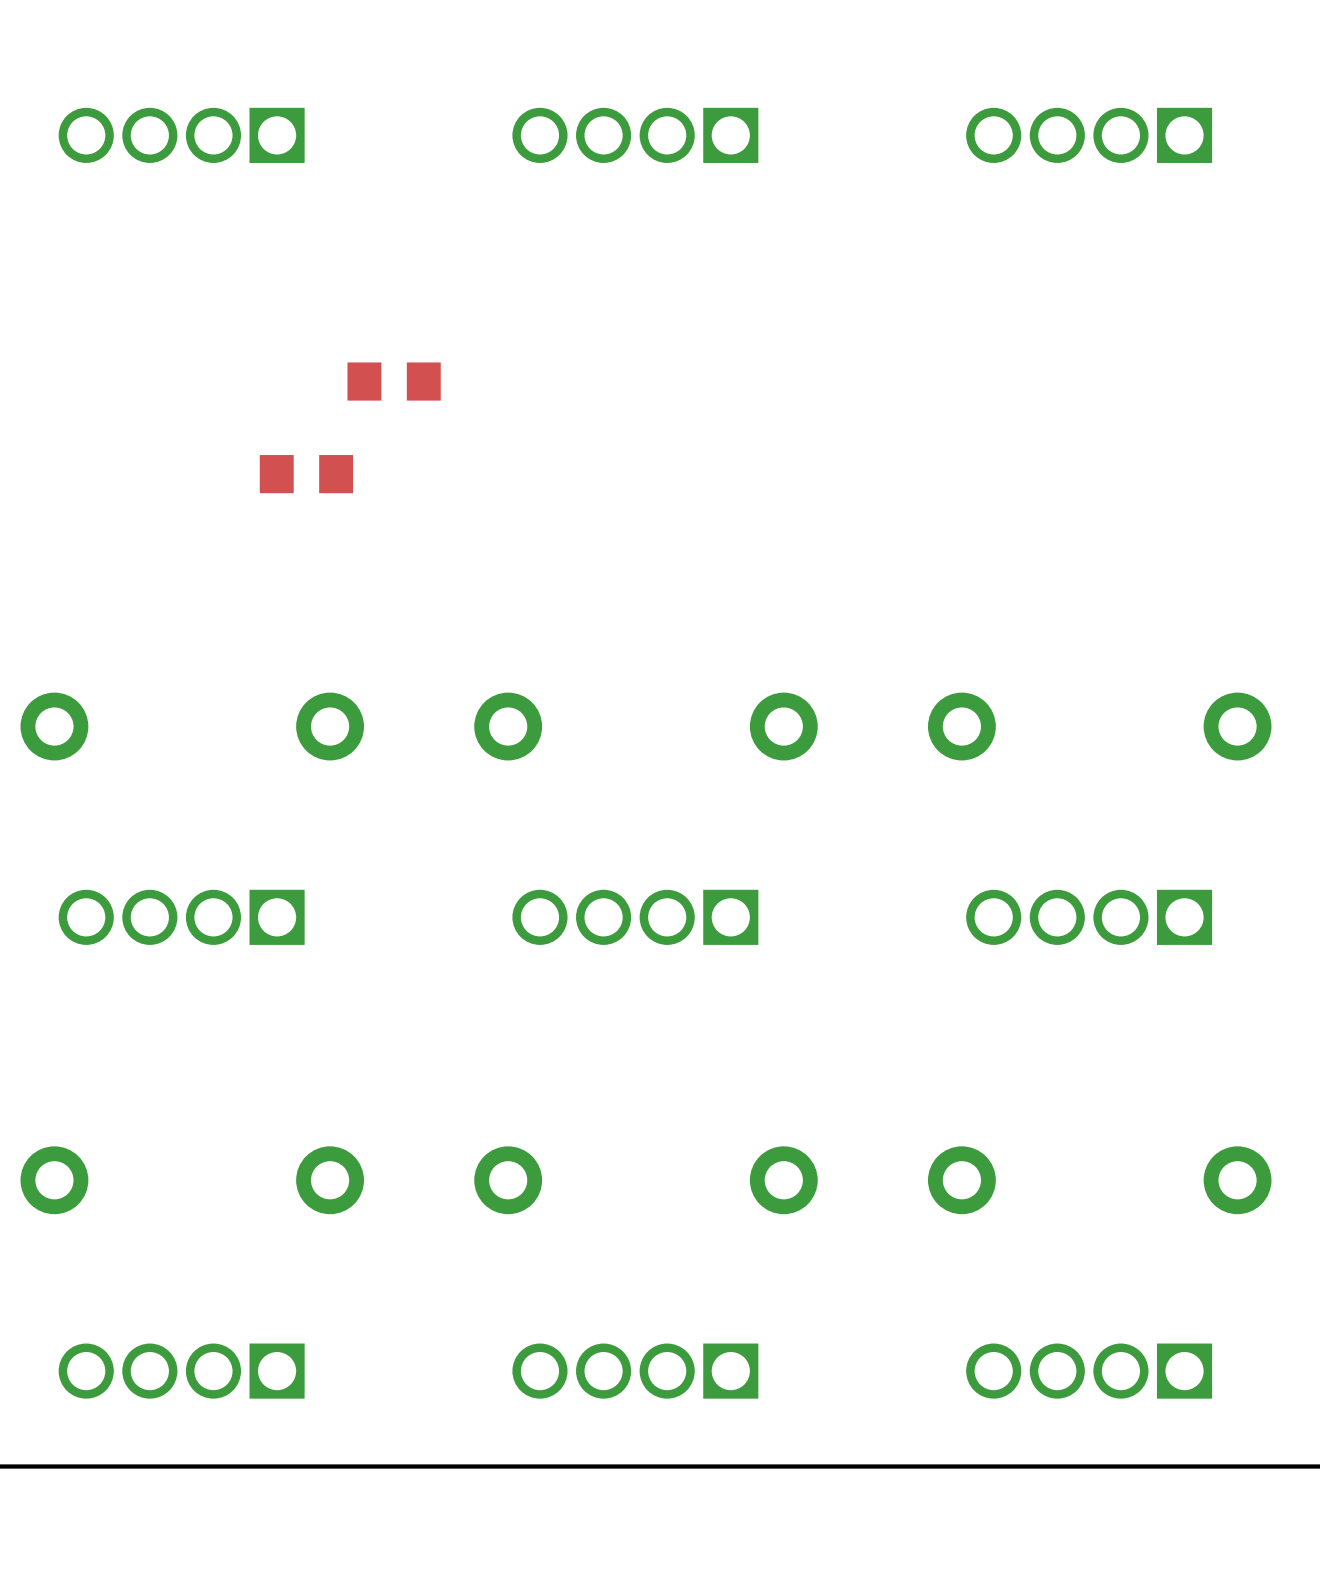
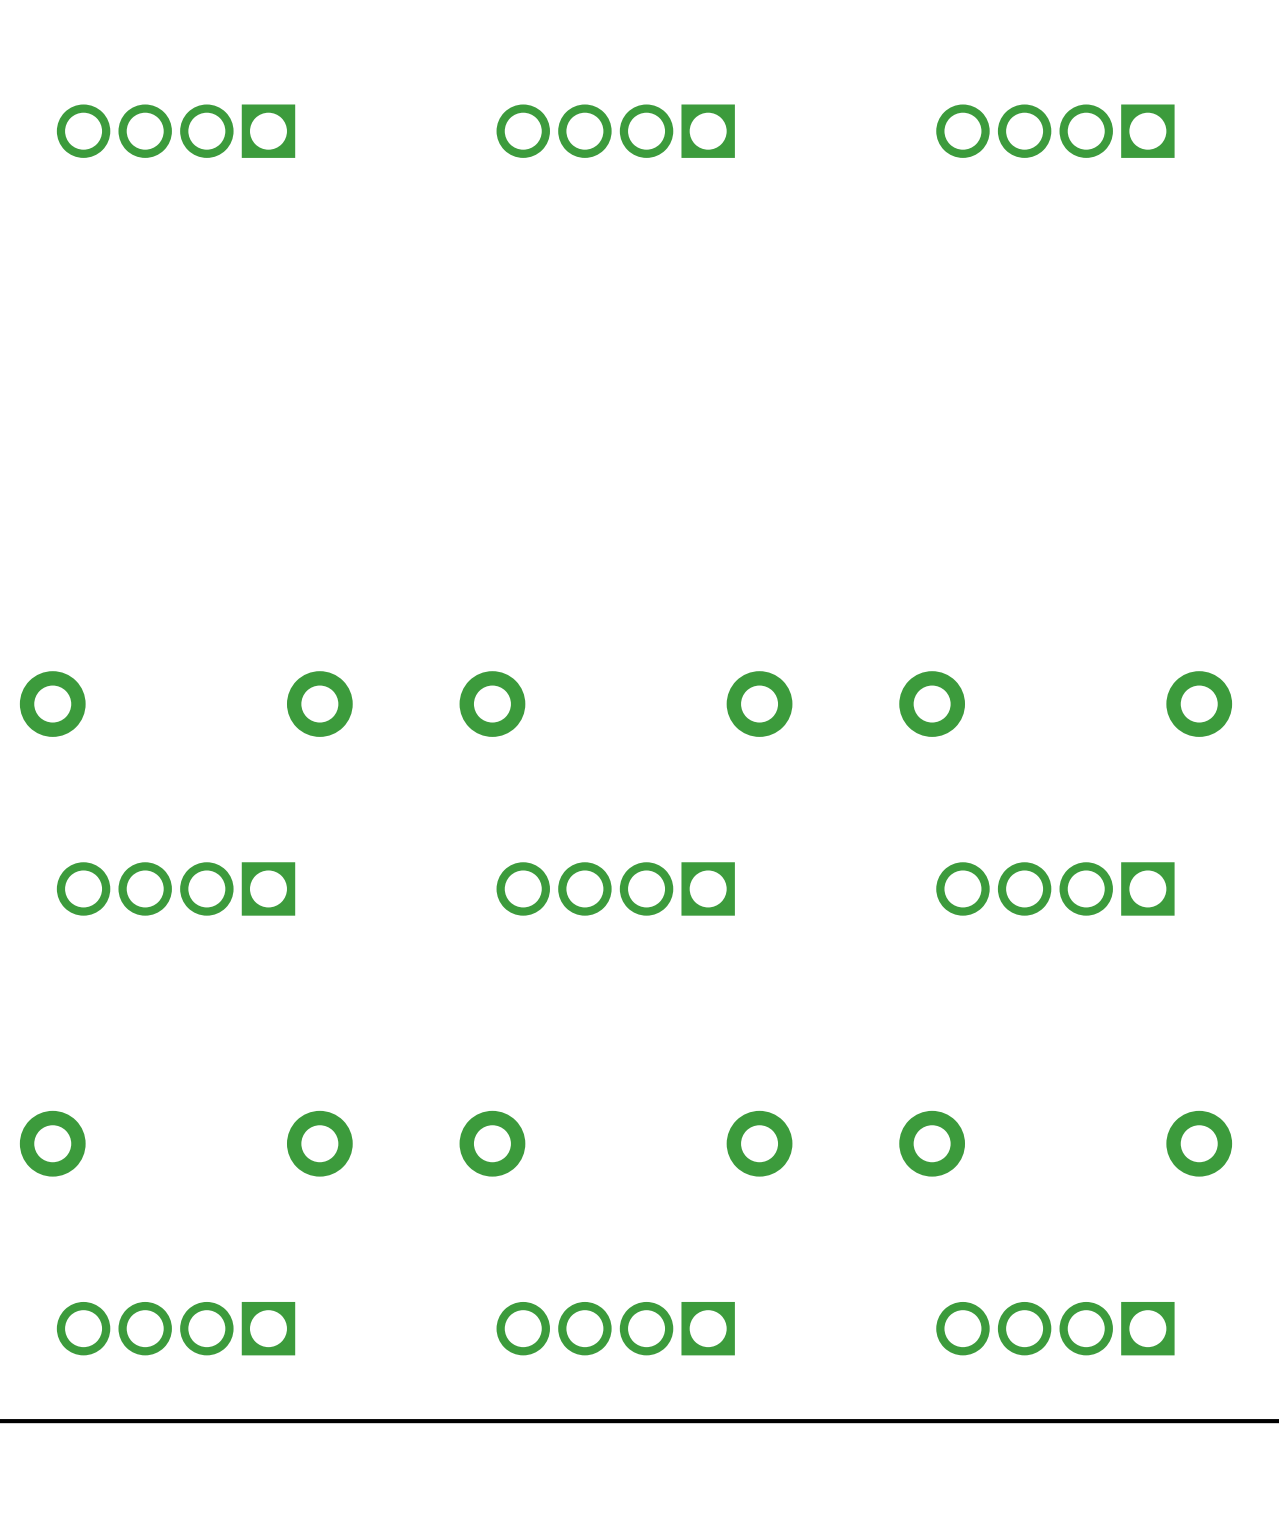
part: (394, 381) -> none
part: (306, 474) -> none

